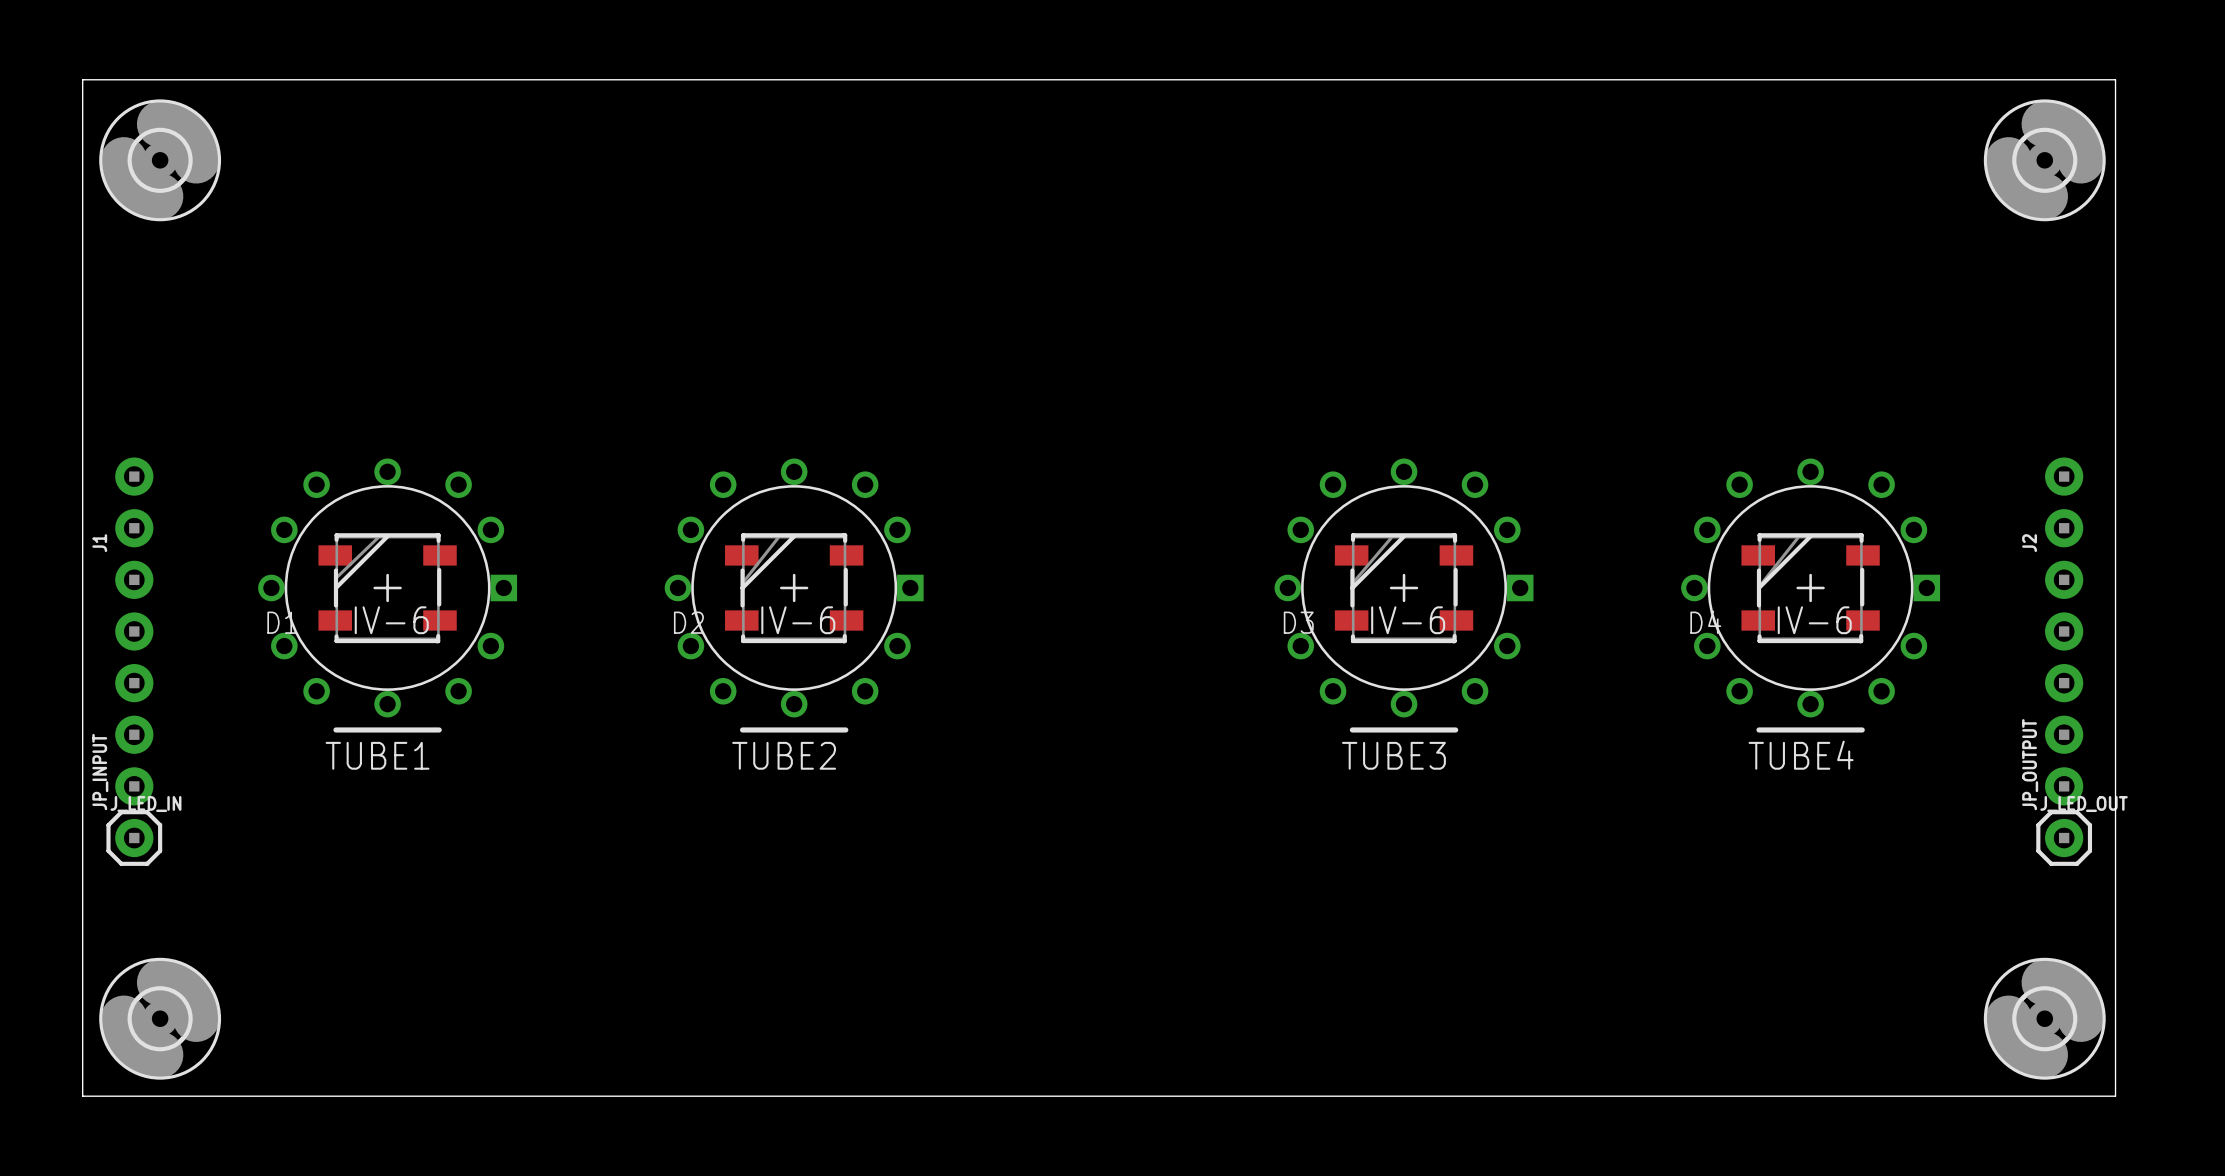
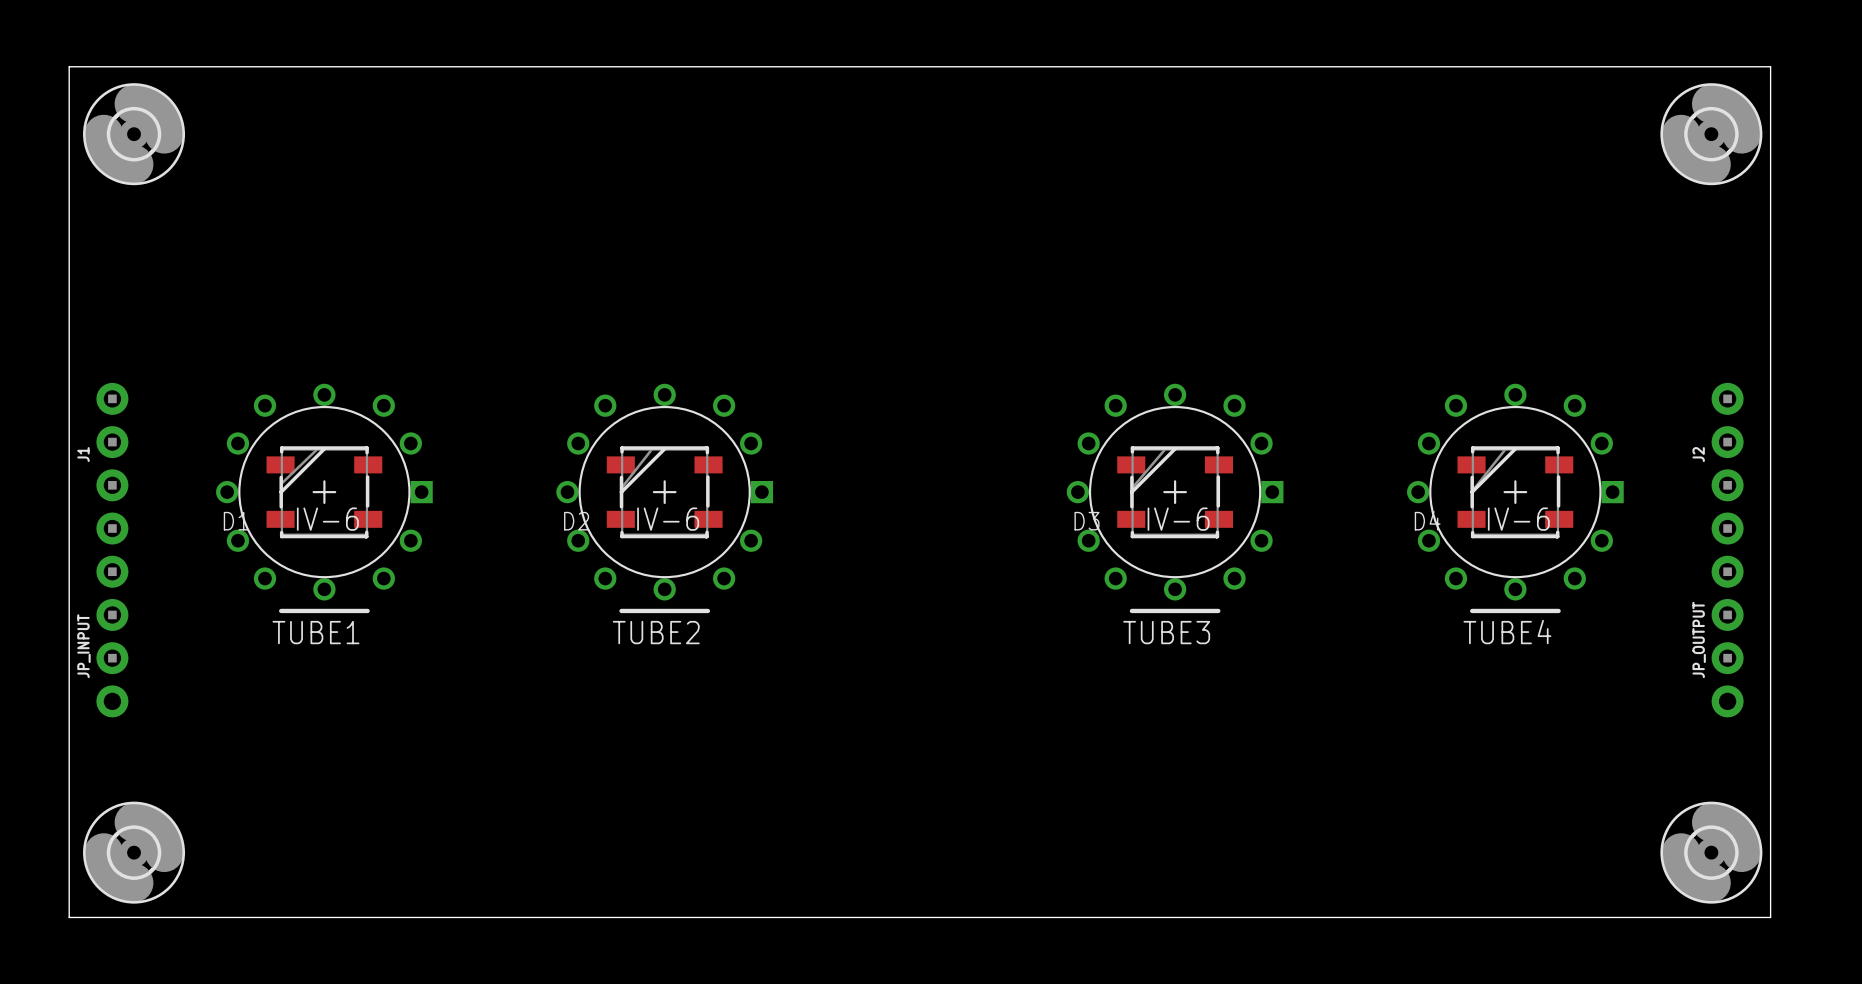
J_LED_IN: (134, 838) -> none
part: none -> (112, 701)
J_LED_OUT: (2064, 838) -> none
part: none -> (1727, 701)

